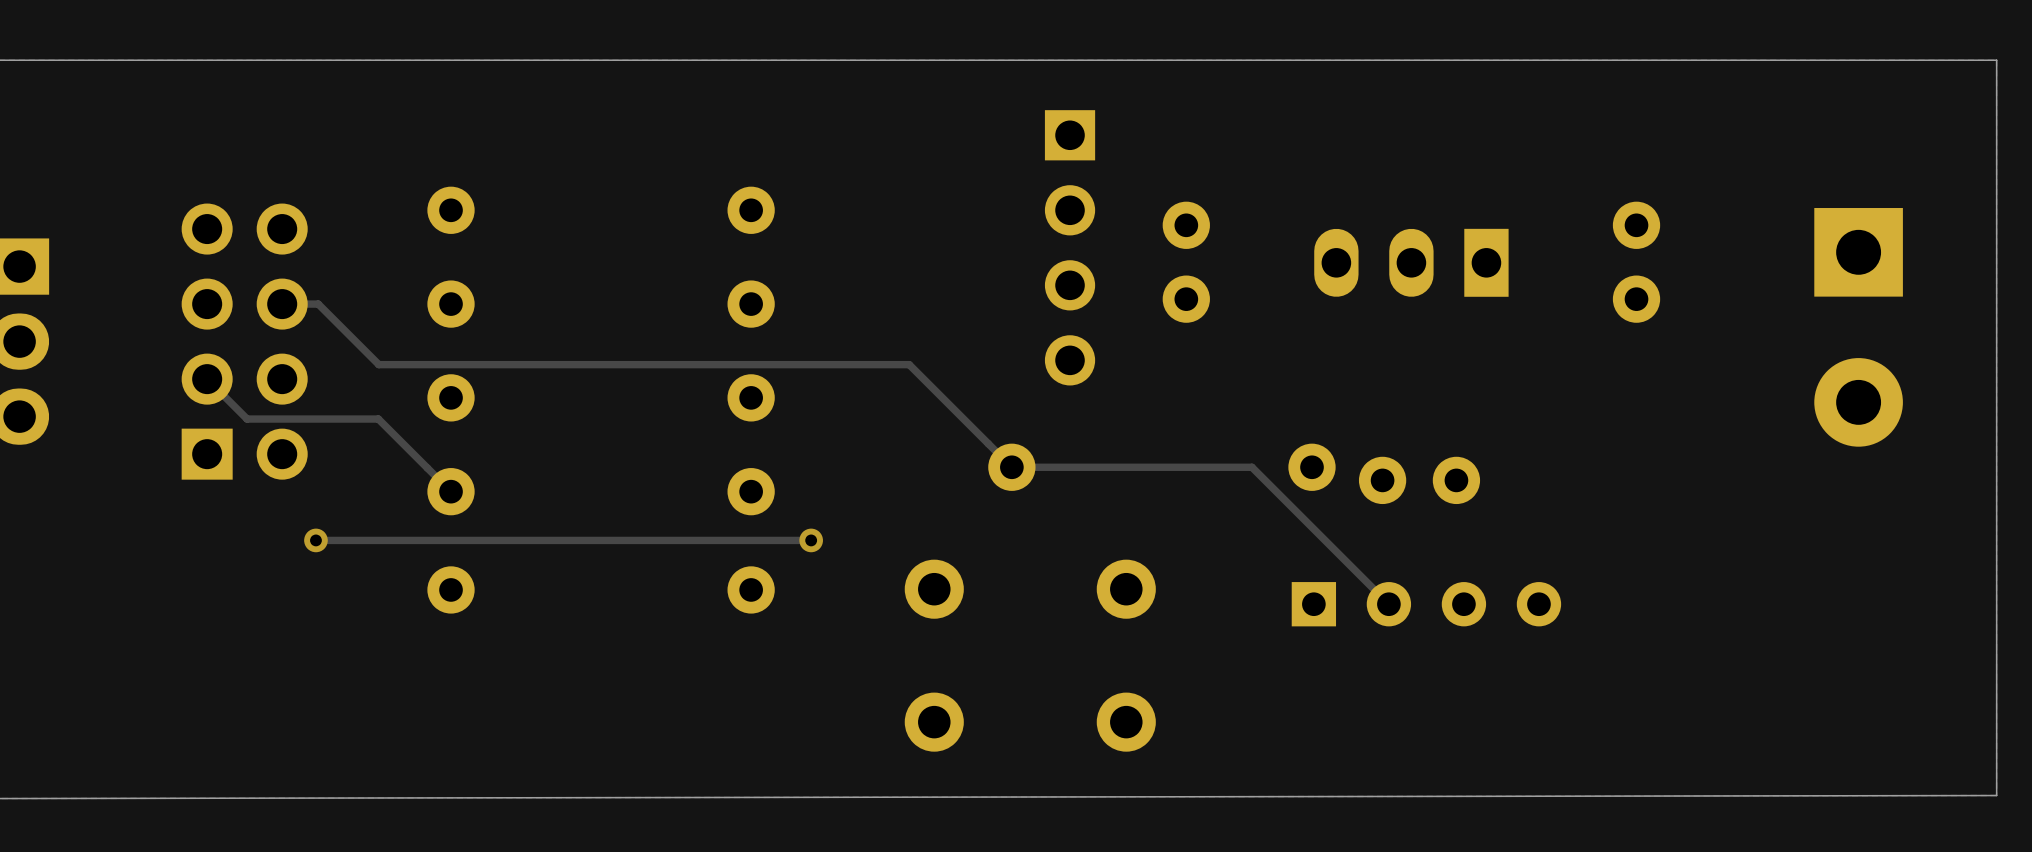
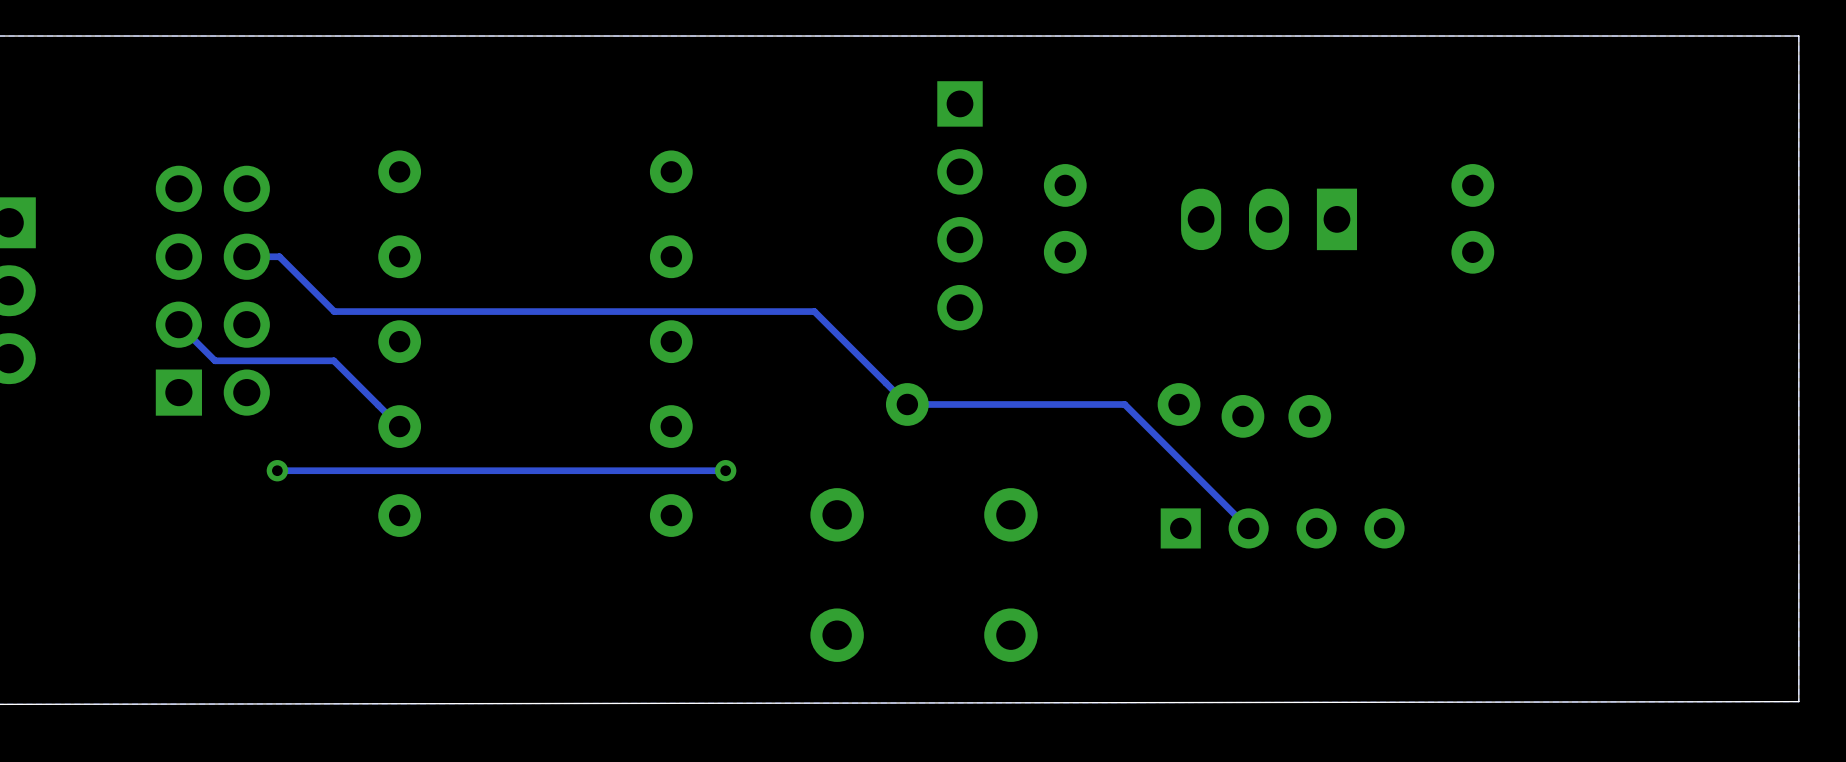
part: (1858, 327) -> none

